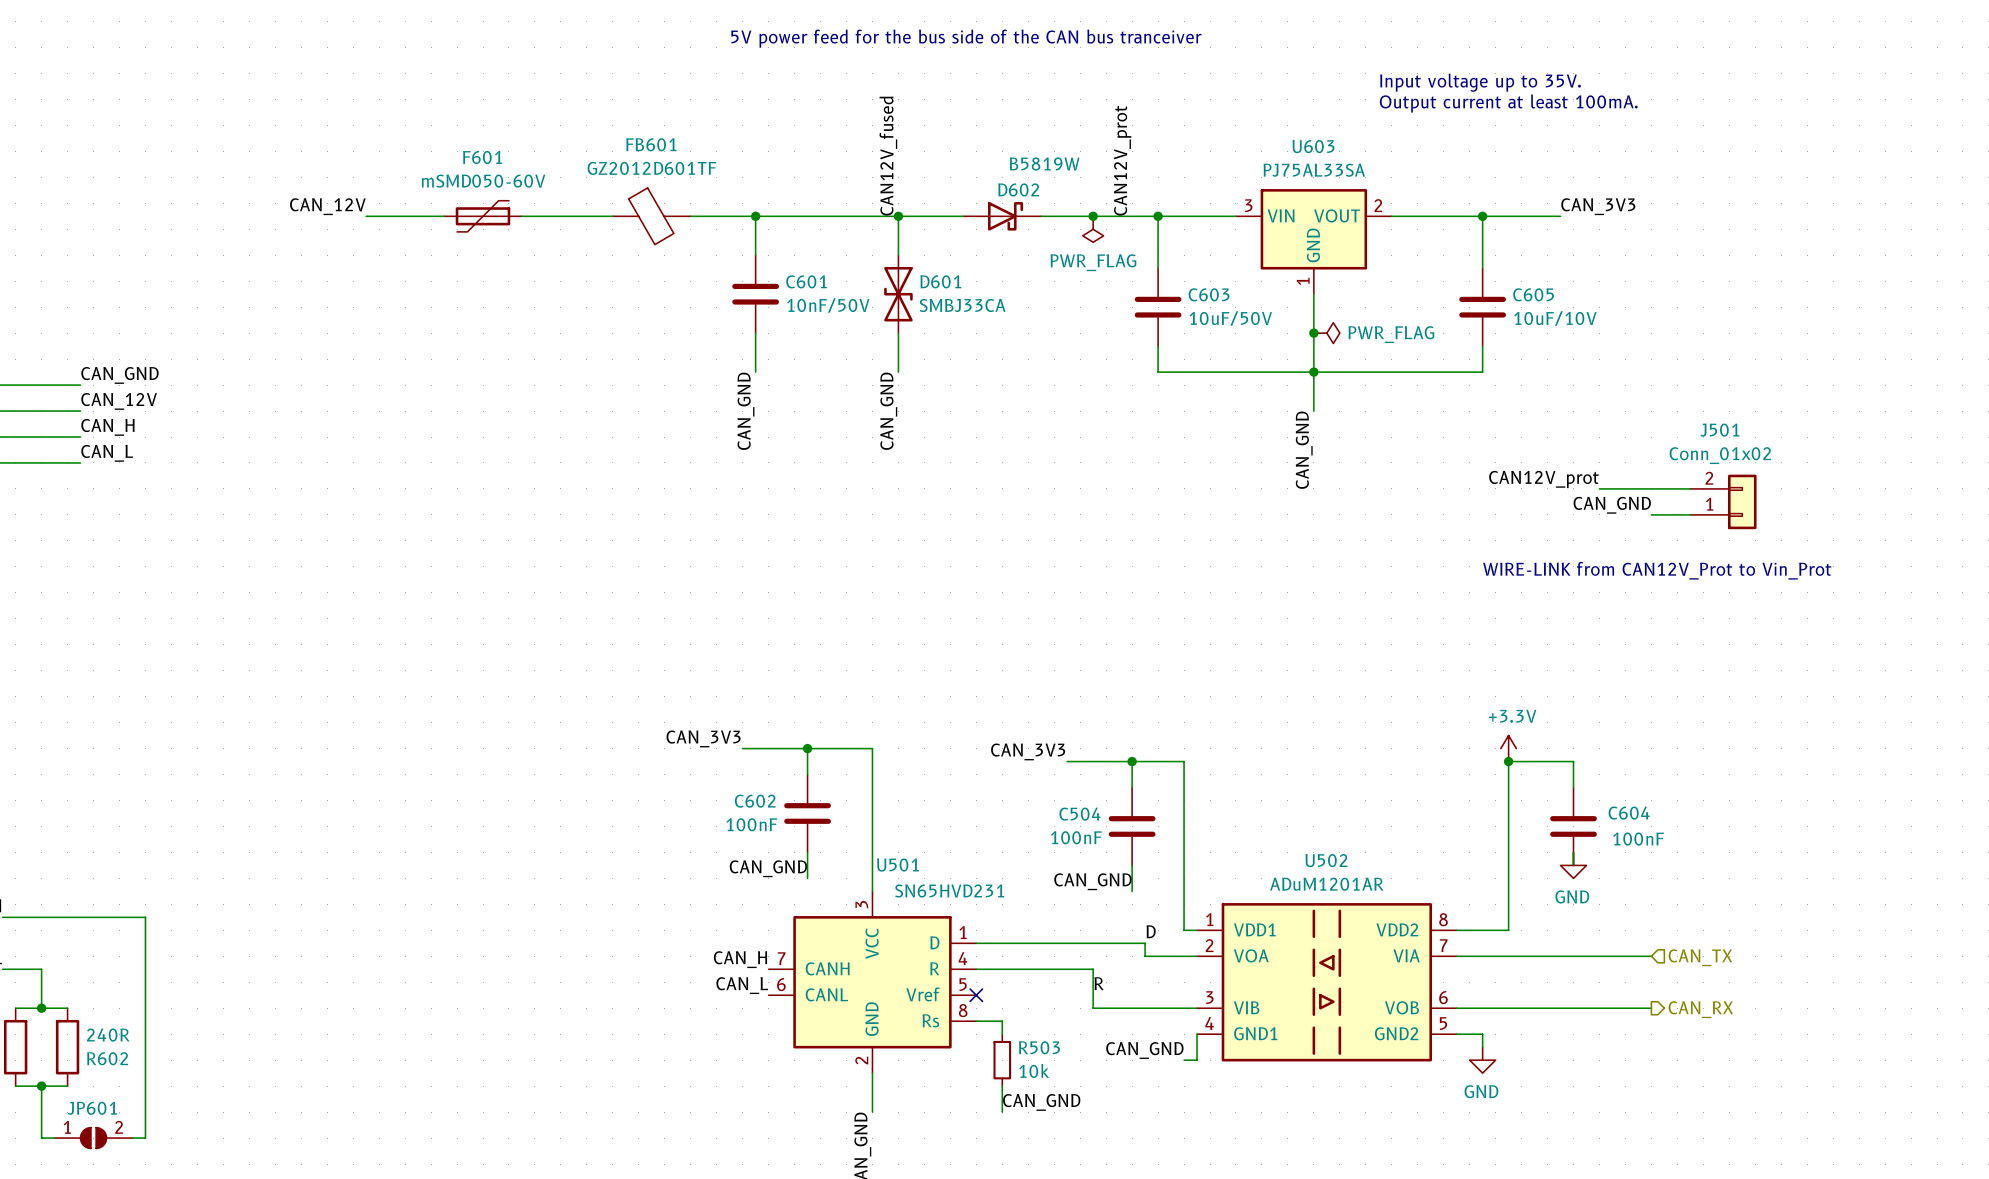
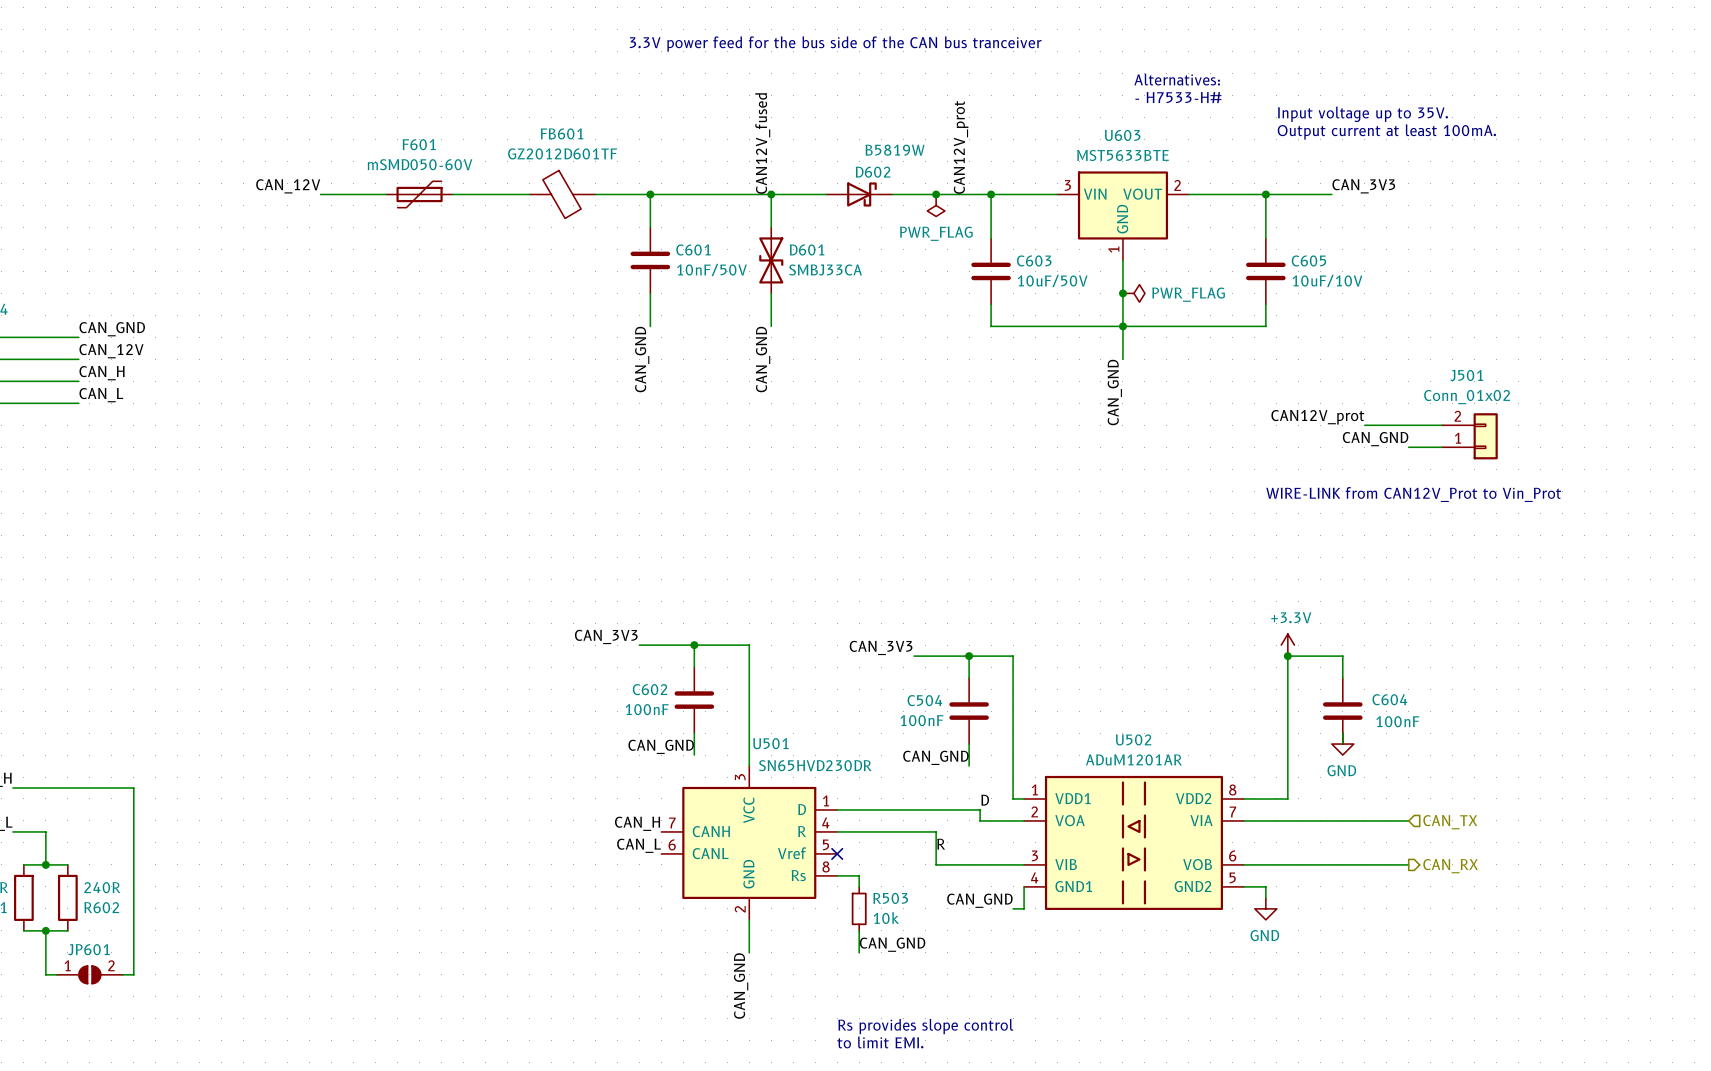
text: 5V power feed for the bus side of the CAN bus tranceiver (966, 38) -> 3.3V power feed for the bus side of the CAN bus tranceiver (835, 44)
text: none -> Alternatives: (1177, 79)
text position: Input voltage up to 35V. (1480, 82) -> Input voltage up to 35V. (1362, 114)
text: none -> - H7533-H# (1178, 97)
text position: Output current at least 100mA. (1508, 103) -> Output current at least 100mA. (1386, 131)
U603 value: PJ75AL33SA (1314, 170) -> MST5633BTE (1123, 155)
U501 value: SN65HVD231 (949, 890) -> SN65HVD230DR (815, 765)

